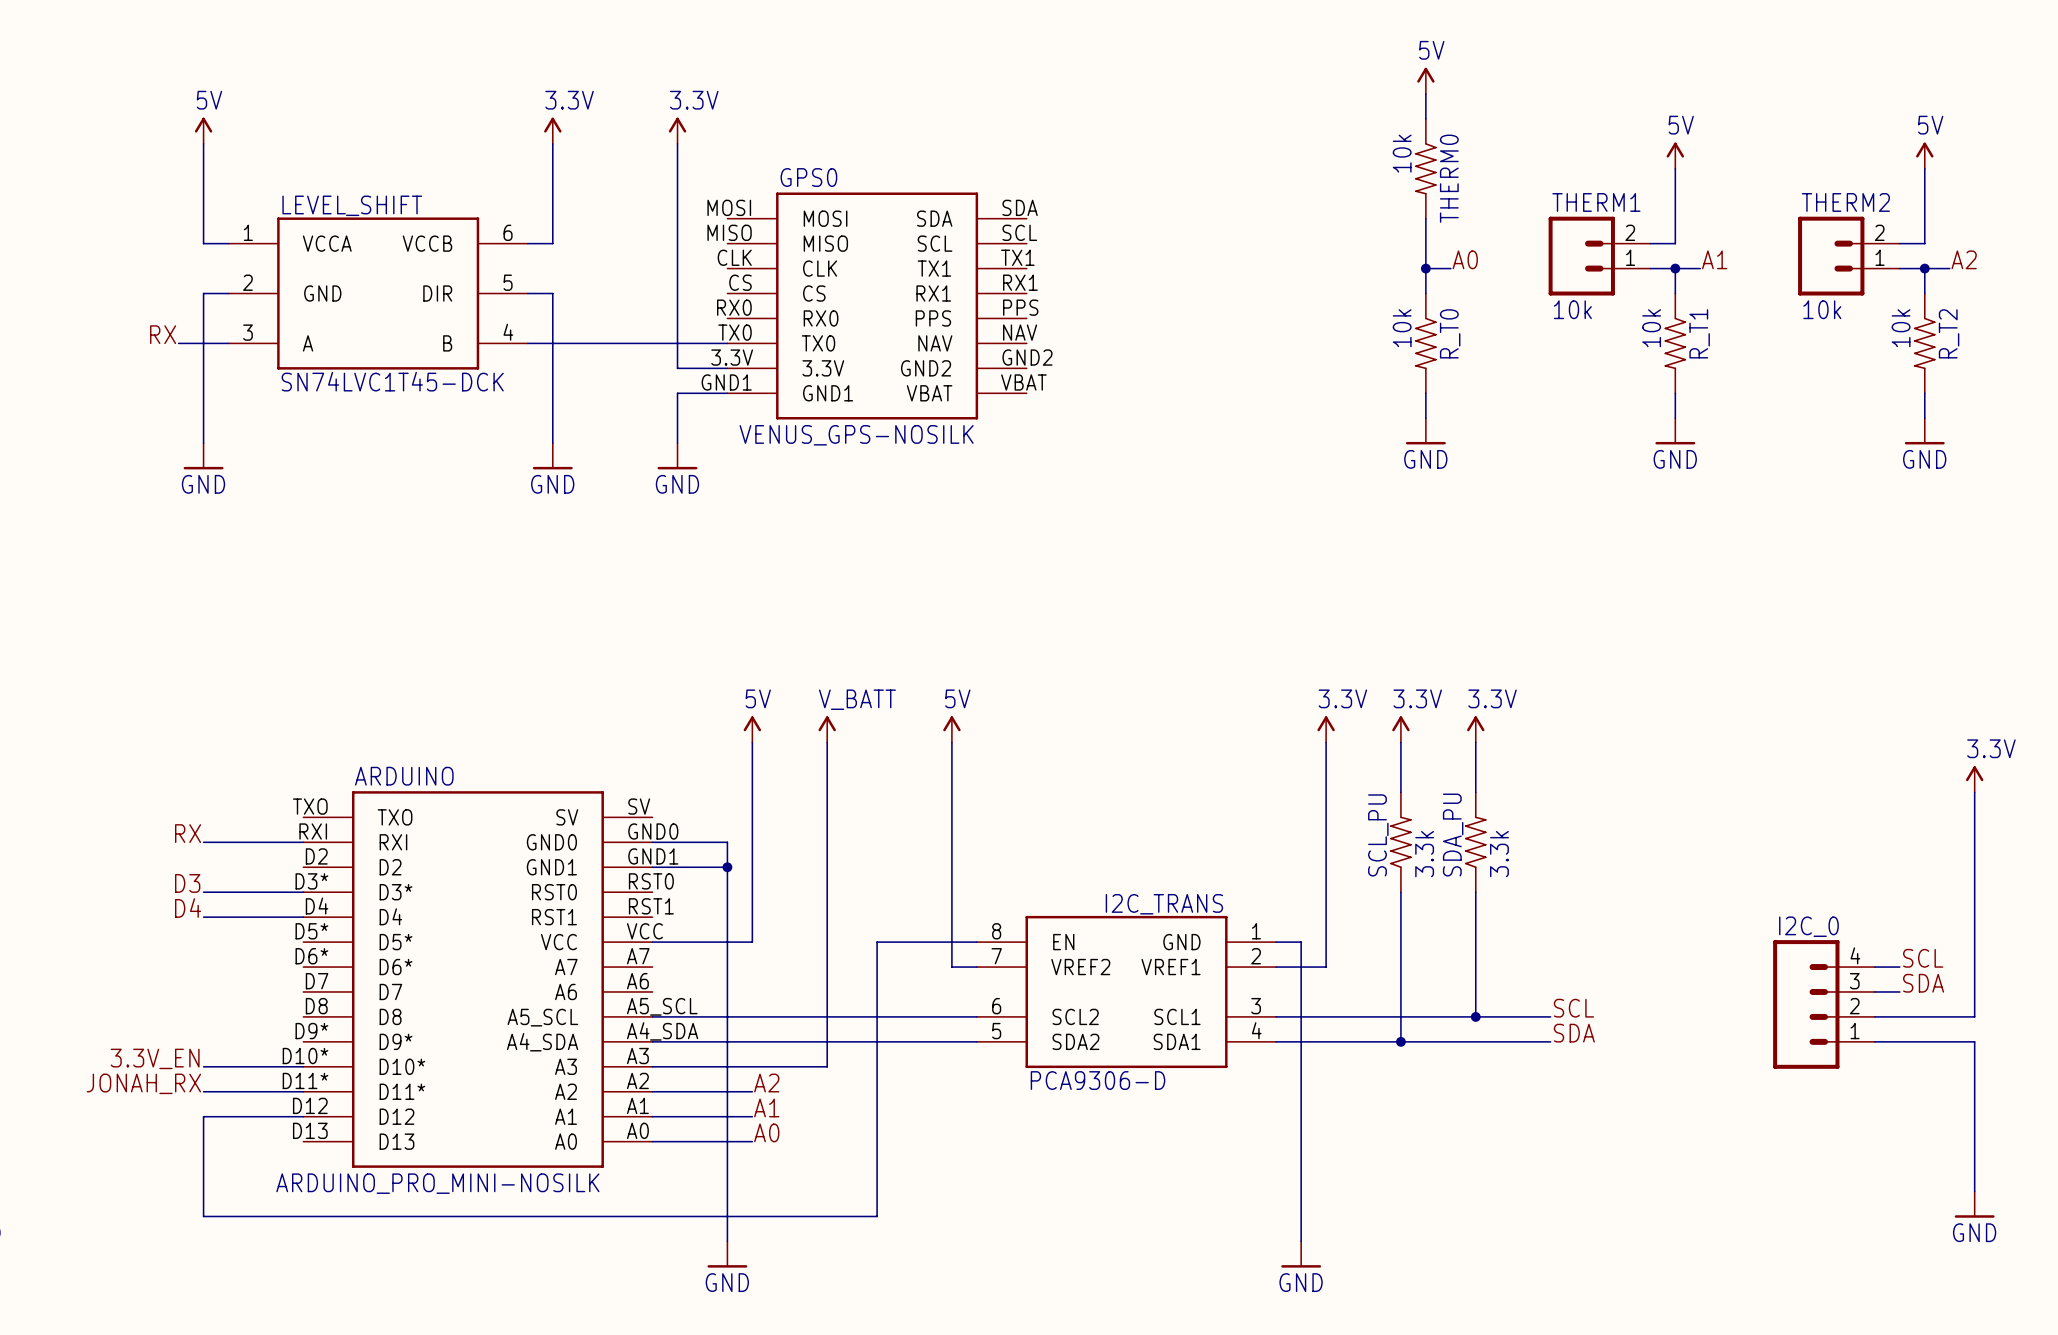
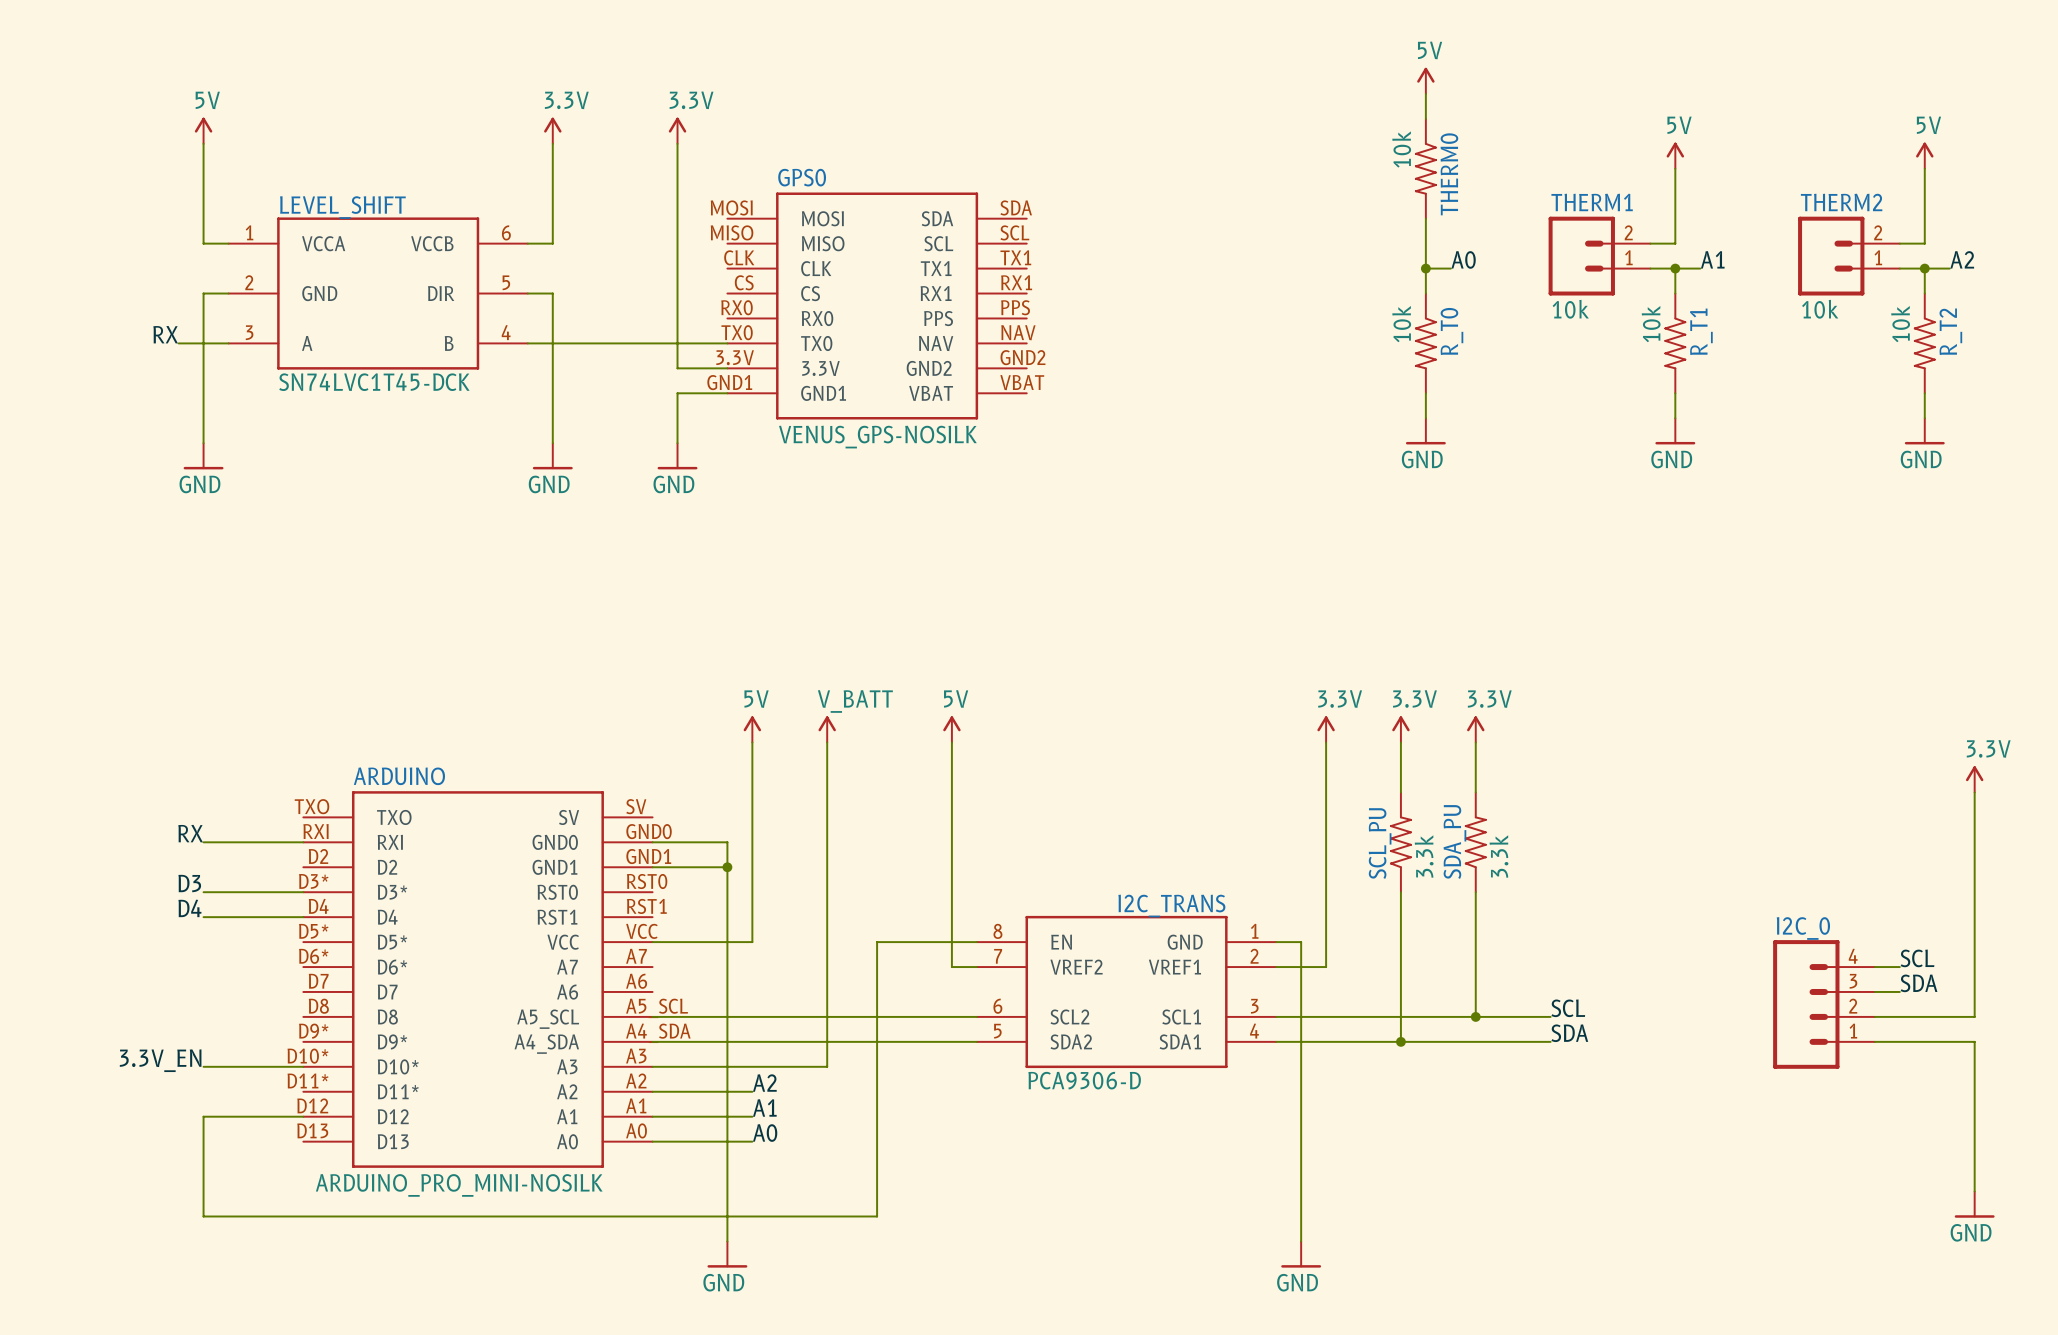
label: JONAH_RX (143, 1083) -> none
wire: (203, 1091) (303, 1091) -> none

